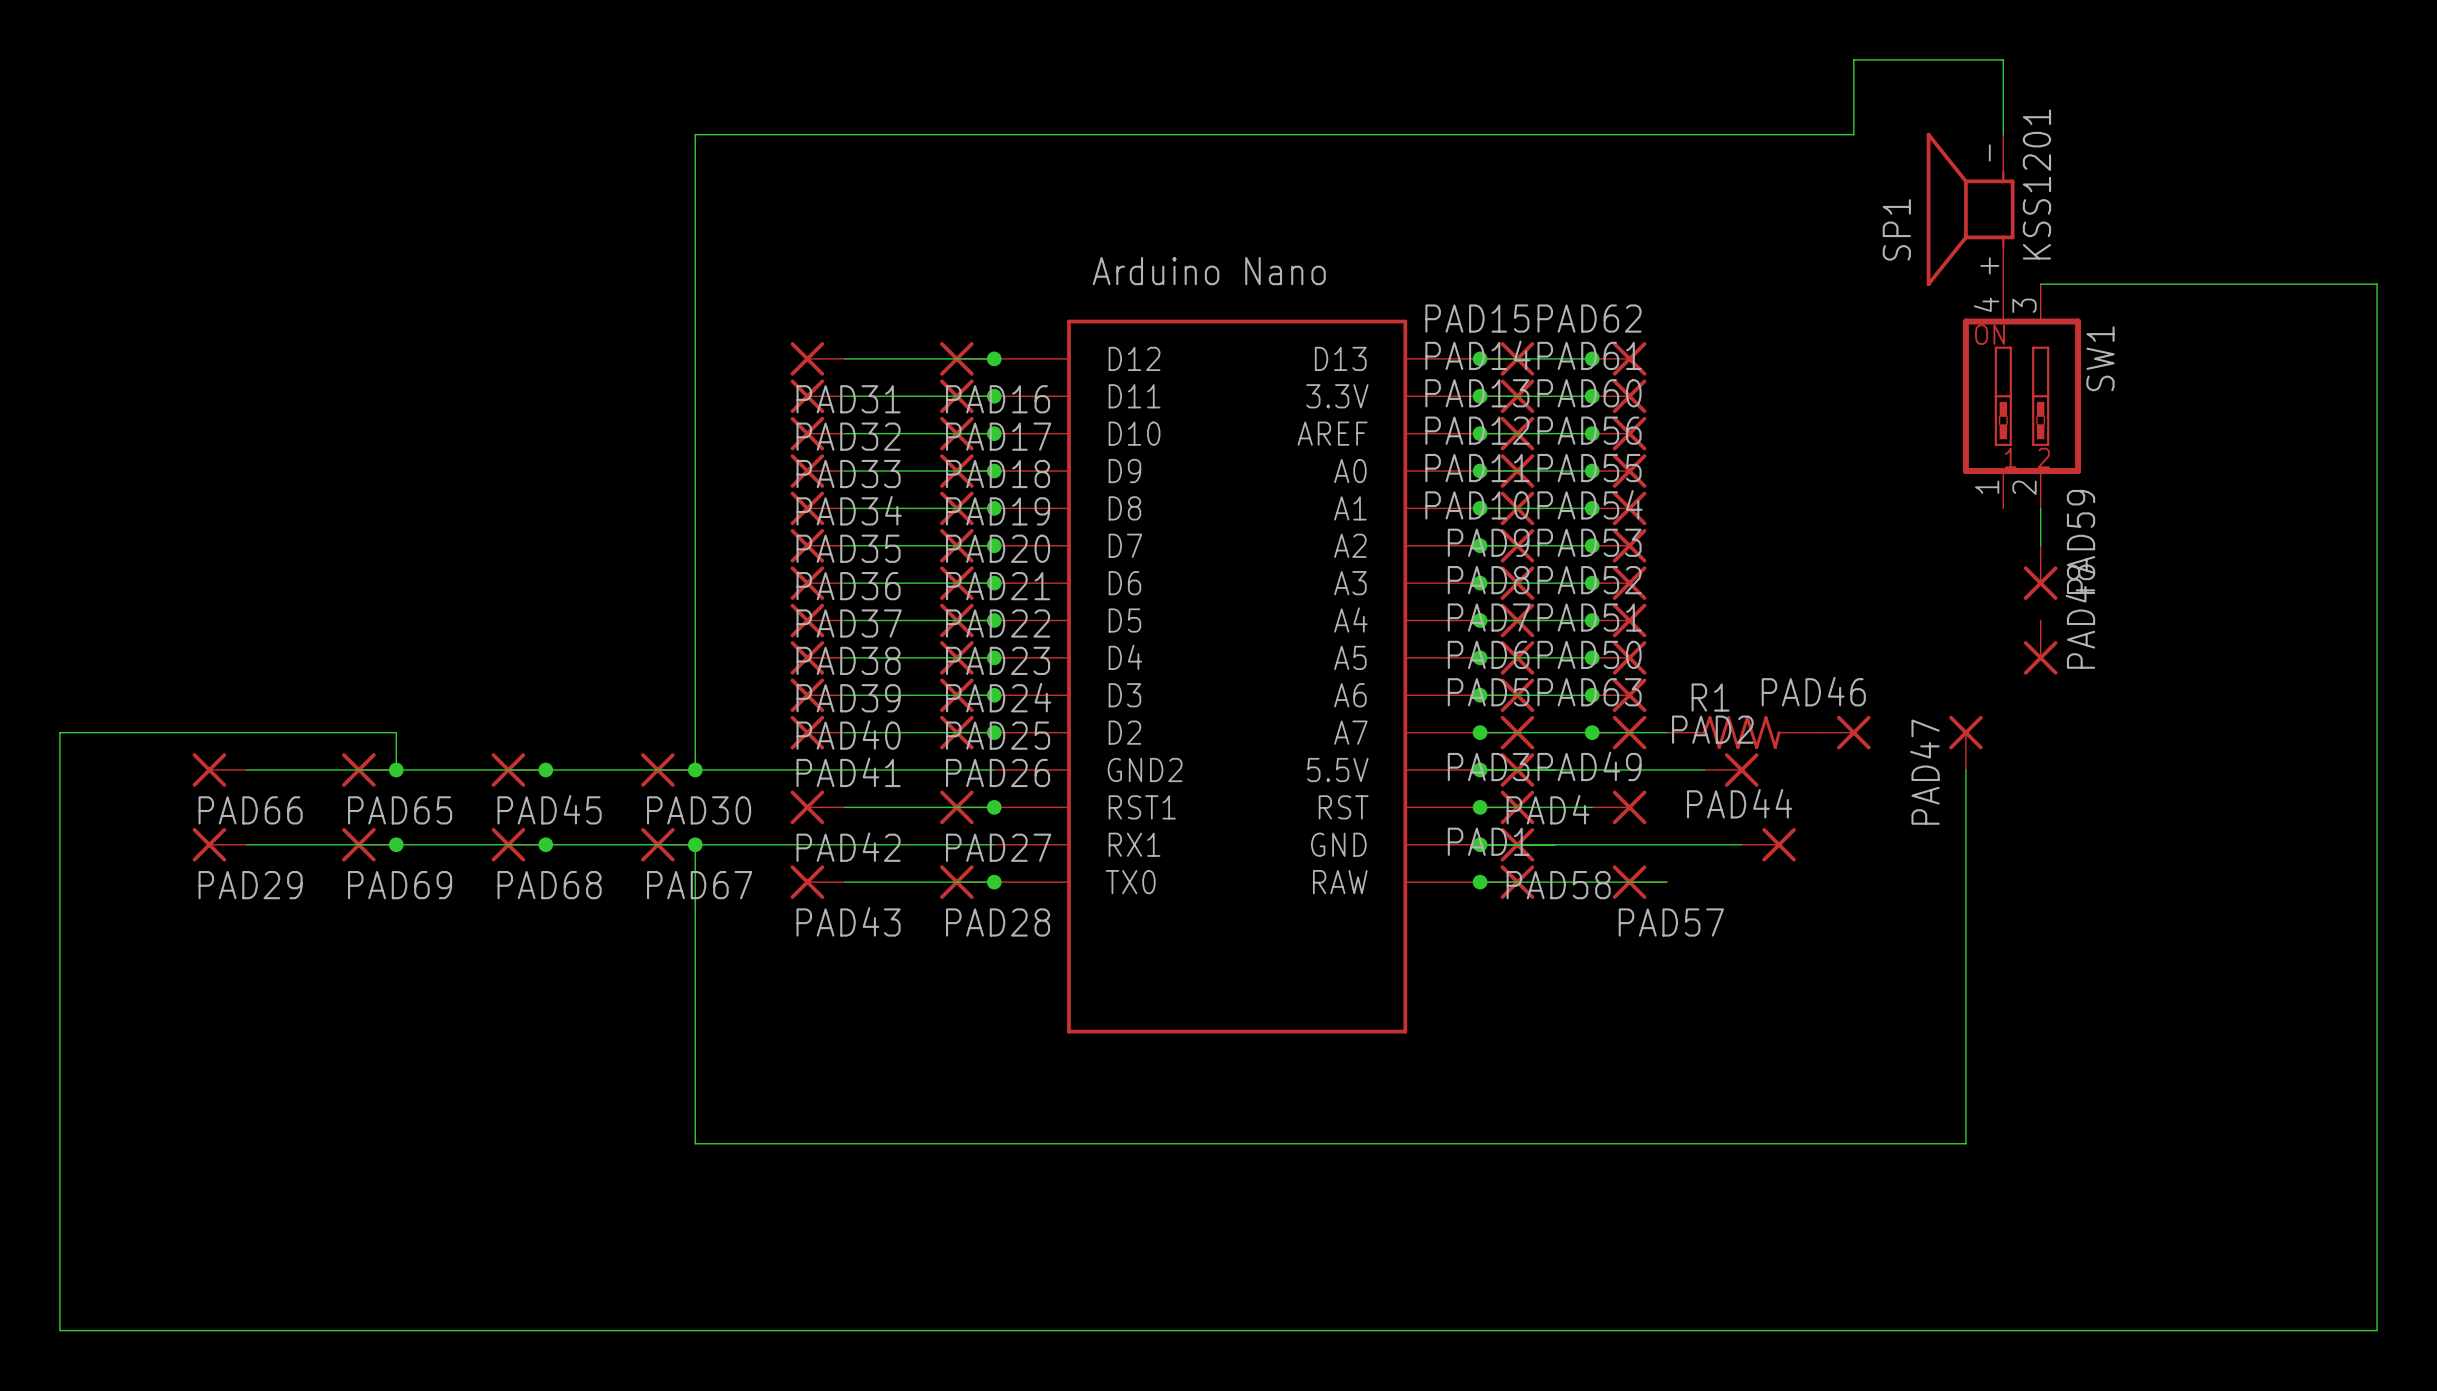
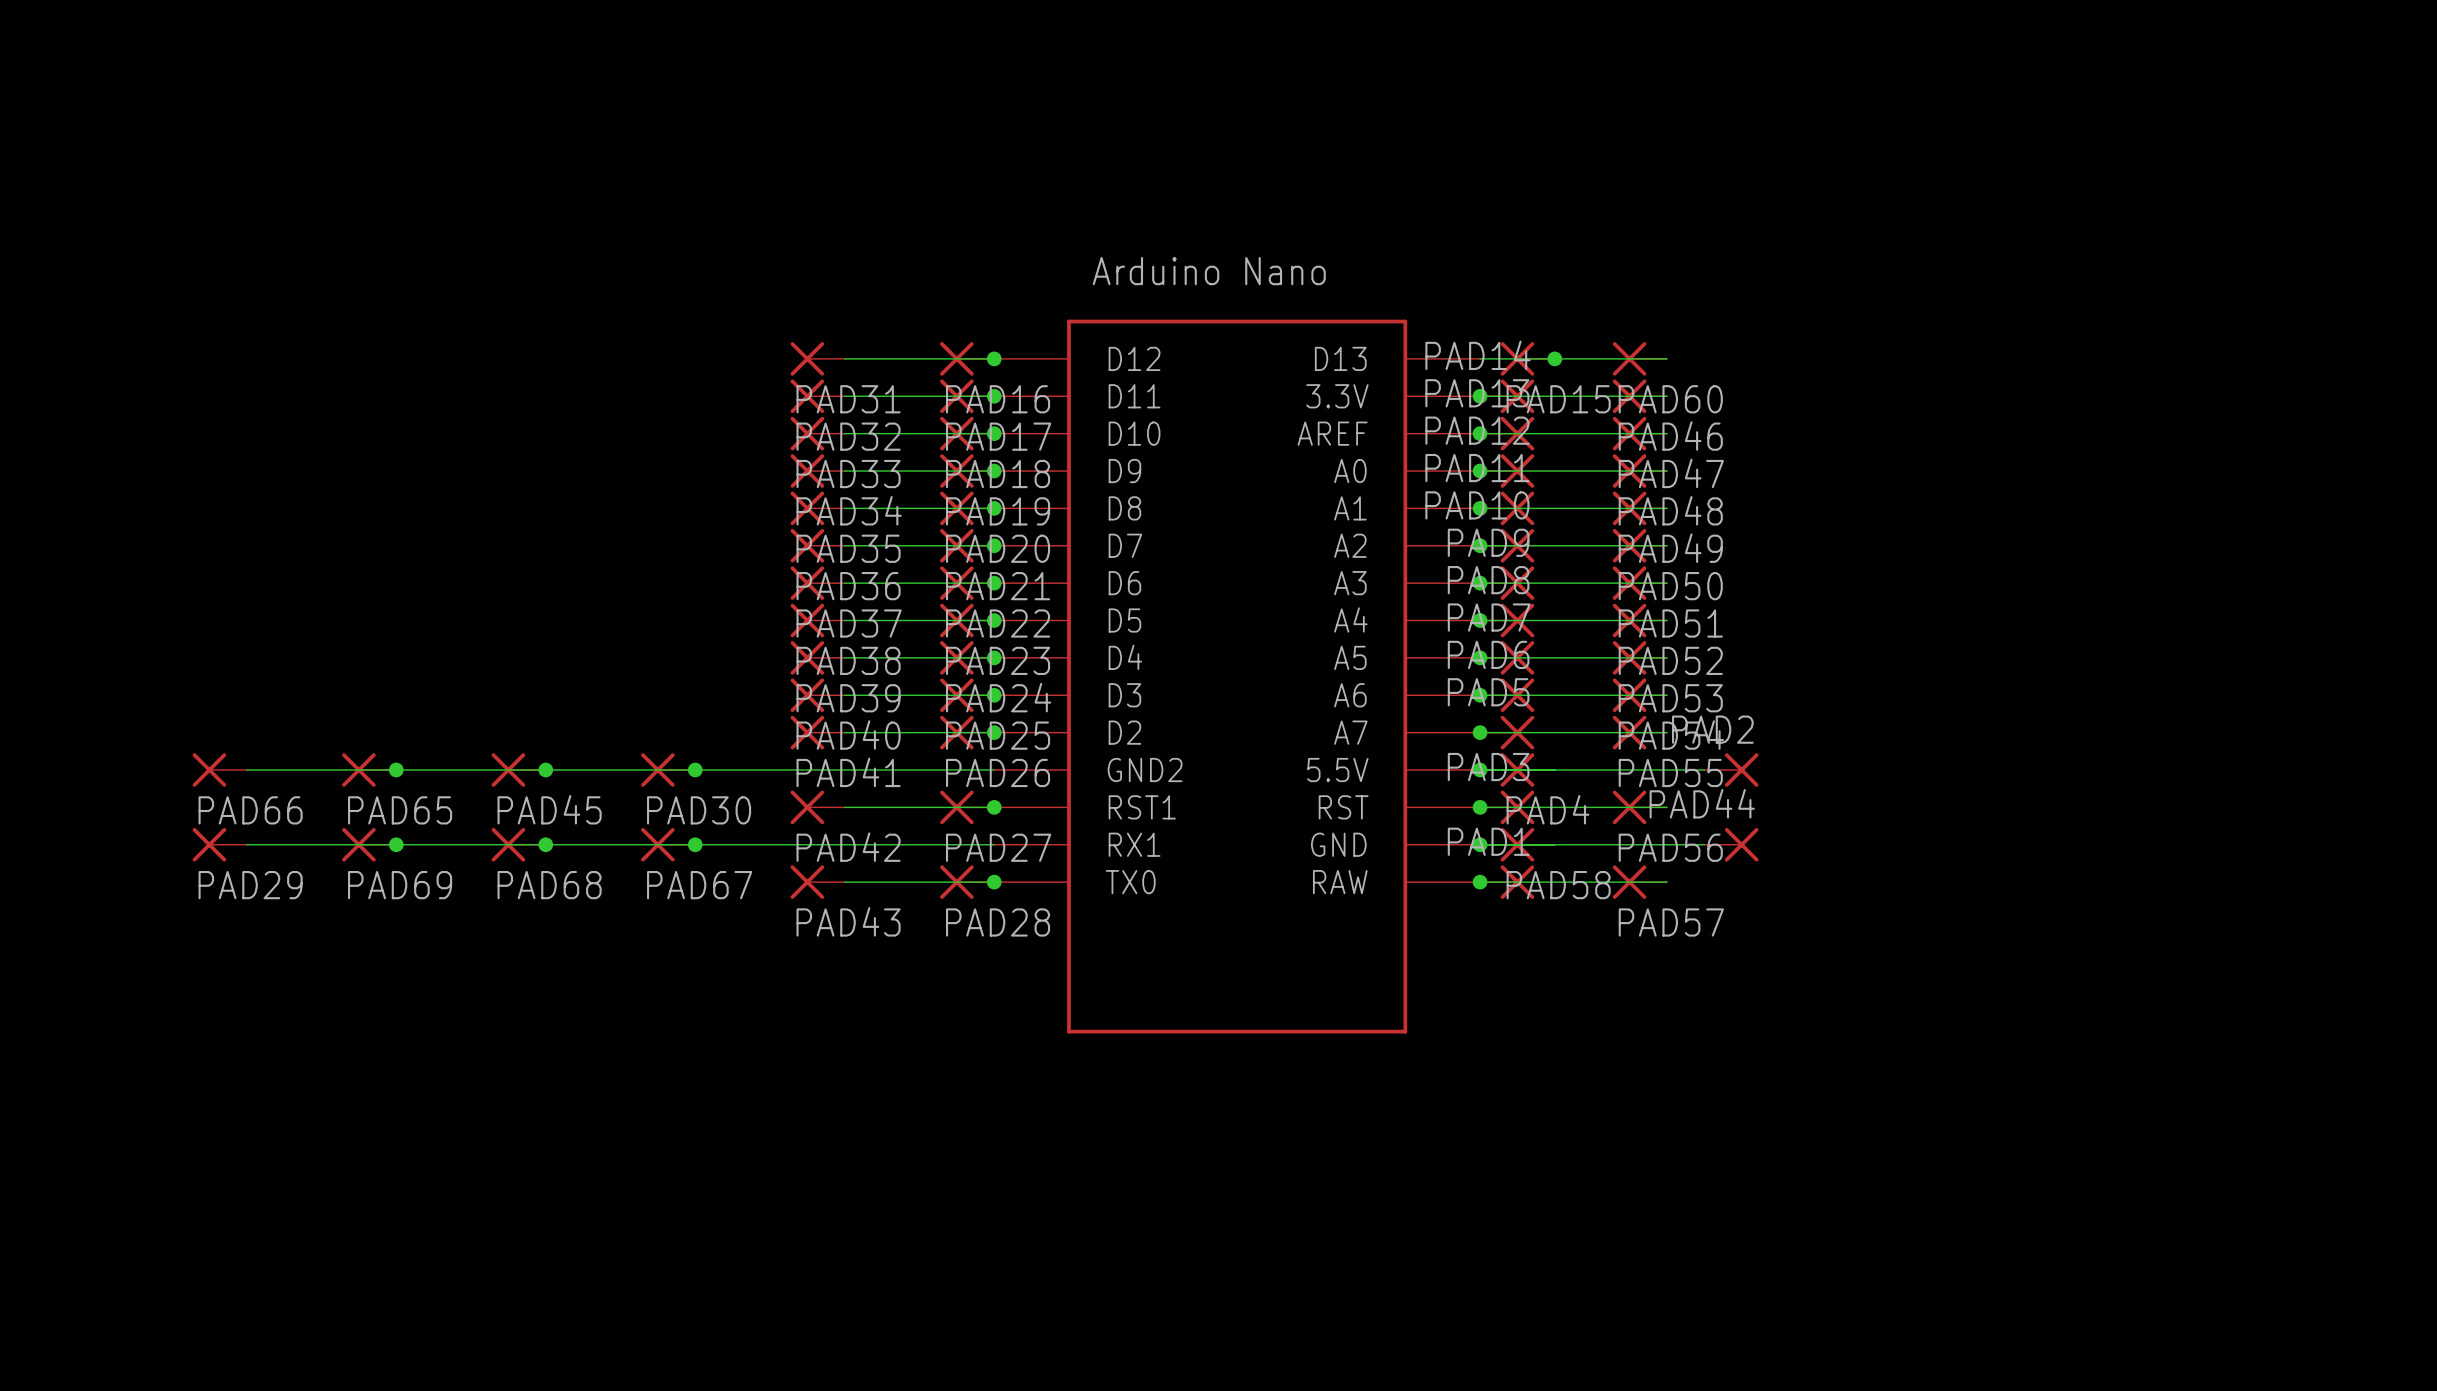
wire: (2003, 134) (2003, 59) (1853, 59) (1853, 134) (695, 134) (695, 770) -> none
SP1: KSS1201 (1970, 209) -> none
wire: (2040, 284) (2377, 284) (2377, 1330) (59, 1330) (59, 732) (396, 732) (396, 770) -> none
junction: (1480, 358) -> none
PAD15 rotation: 0° (1517, 358) -> 180° (1517, 358)
junction: none -> (1554, 358)
junction: (1592, 358) -> none
PAD62: (1619, 358) -> none
junction: (1592, 396) -> none
PAD61: (1619, 396) -> none
SW1: (2022, 396) -> none
junction: (1592, 433) -> none
PAD60 position: (1619, 433) -> (1639, 358)
PAD60 rotation: 0° (1629, 433) -> 180° (1629, 358)
junction: (1592, 471) -> none
PAD56 position: (1619, 471) -> (1639, 807)
PAD56 rotation: 0° (1629, 471) -> 180° (1629, 807)
junction: (1592, 508) -> none
PAD55 position: (1619, 508) -> (1639, 732)
PAD55 rotation: 0° (1629, 508) -> 180° (1629, 732)
wire: (2040, 508) (2040, 545) -> none
junction: (1592, 545) -> none
PAD54 position: (1619, 545) -> (1639, 695)
PAD54 rotation: 0° (1629, 545) -> 180° (1629, 695)
PAD59: (2040, 572) -> none
junction: (1592, 583) -> none
PAD53 position: (1619, 583) -> (1639, 657)
PAD53 rotation: 0° (1629, 583) -> 180° (1629, 657)
junction: (1592, 620) -> none
PAD52 rotation: 0° (1629, 620) -> 180° (1629, 620)
PAD48 position: (2040, 647) -> (1639, 471)
junction: (1592, 657) -> none
PAD51 position: (1619, 657) -> (1639, 583)
PAD51 rotation: 0° (1629, 657) -> 180° (1629, 583)
PAD48 rotation: 0° (2040, 657) -> 90° clockwise (1629, 471)
junction: (1592, 695) -> none
PAD50 position: (1619, 695) -> (1639, 545)
PAD50 rotation: 0° (1629, 695) -> 180° (1629, 545)
junction: (1592, 732) -> none
PAD63: (1619, 732) -> none
R1: (1741, 732) -> none
PAD46 position: (1843, 732) -> (1639, 396)
PAD46 rotation: 0° (1853, 732) -> 180° (1629, 396)
PAD47 rotation: 0° (1965, 732) -> 90° counterclockwise (1629, 433)
PAD47 position: (1965, 742) -> (1639, 433)
wire: (1965, 770) (1965, 1143) (695, 1143) (695, 844) -> none
PAD49 position: (1619, 807) -> (1639, 508)
PAD49 rotation: 0° (1629, 807) -> 180° (1629, 508)
PAD44 position: (1768, 844) -> (1731, 844)

